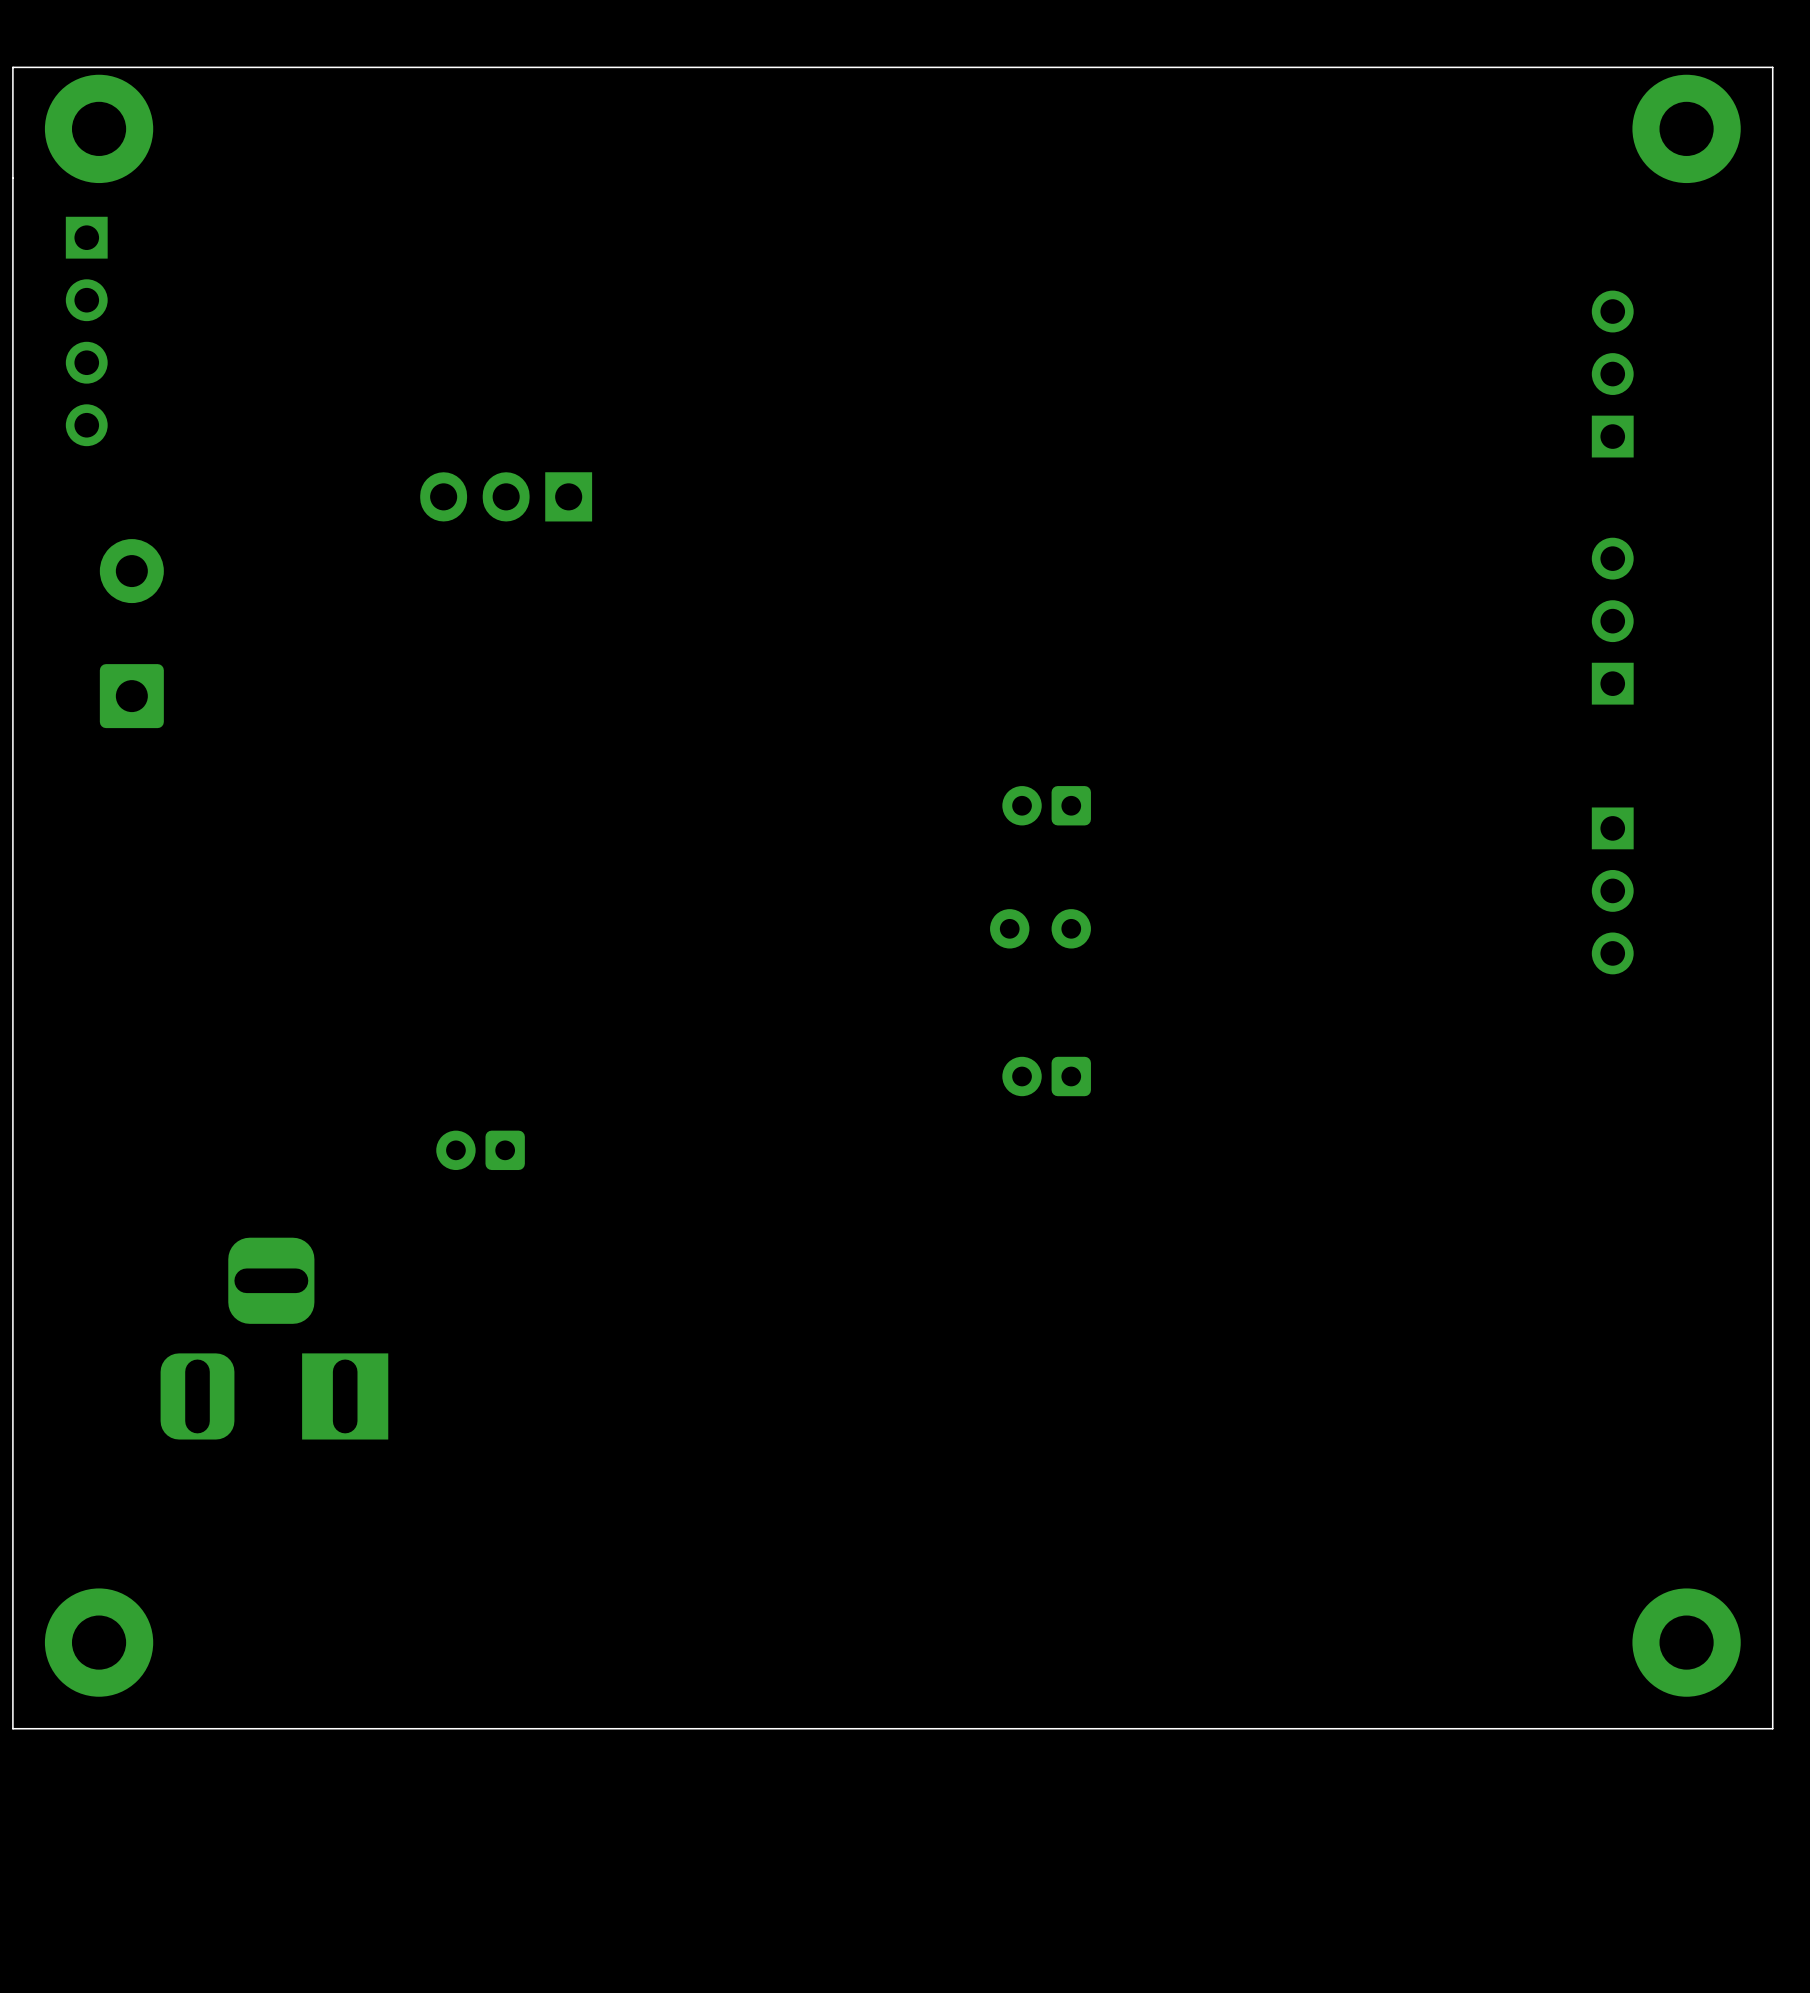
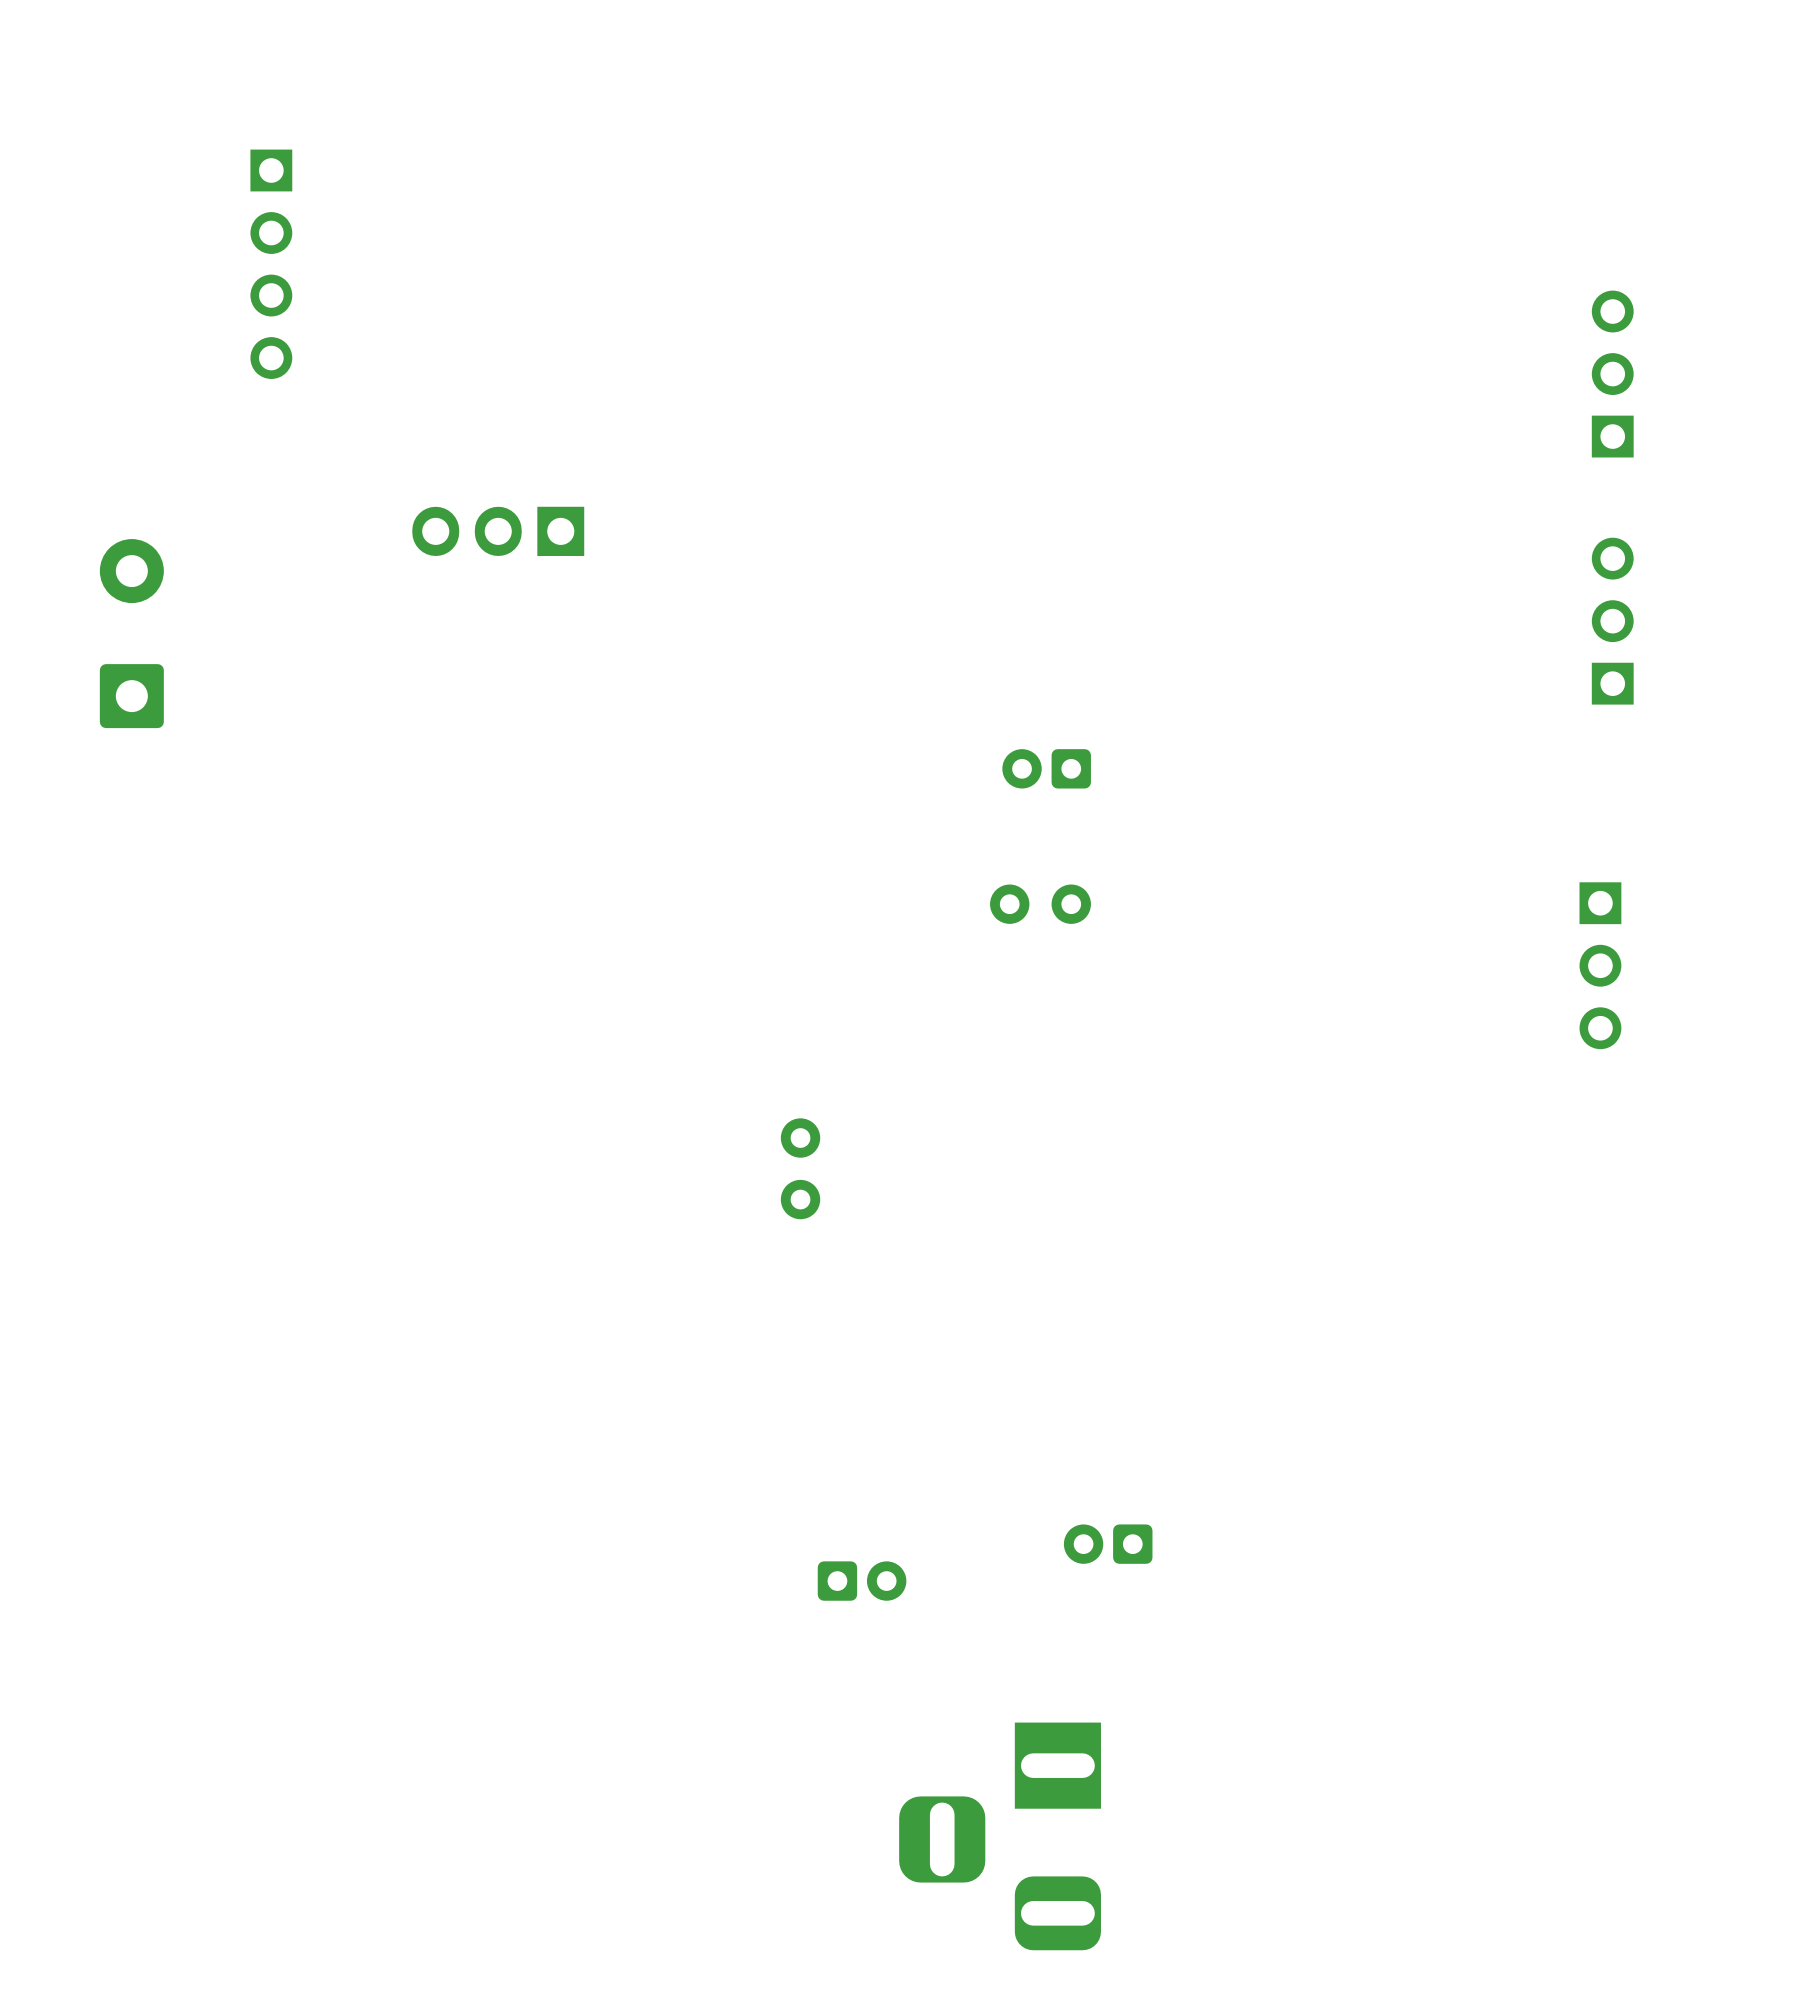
board edge: (1772, 67) (12, 67) (12, 1728) (1772, 1728) (1772, 67) -> none
part: (99, 128) -> none
part: (1686, 128) -> none
part position: (86, 331) -> (271, 264)
part position: (506, 496) -> (498, 531)
part position: (1046, 805) -> (1046, 768)
part position: (1612, 890) -> (1600, 965)
part position: (1040, 928) -> (1040, 904)
part: (1046, 1076) -> none
part: (480, 1150) -> none
part: none -> (800, 1168)
part: (274, 1338) -> none
part: none -> (1108, 1544)
part: none -> (862, 1581)
part: (99, 1642) -> none
part: (1686, 1642) -> none
part: none -> (1000, 1836)

